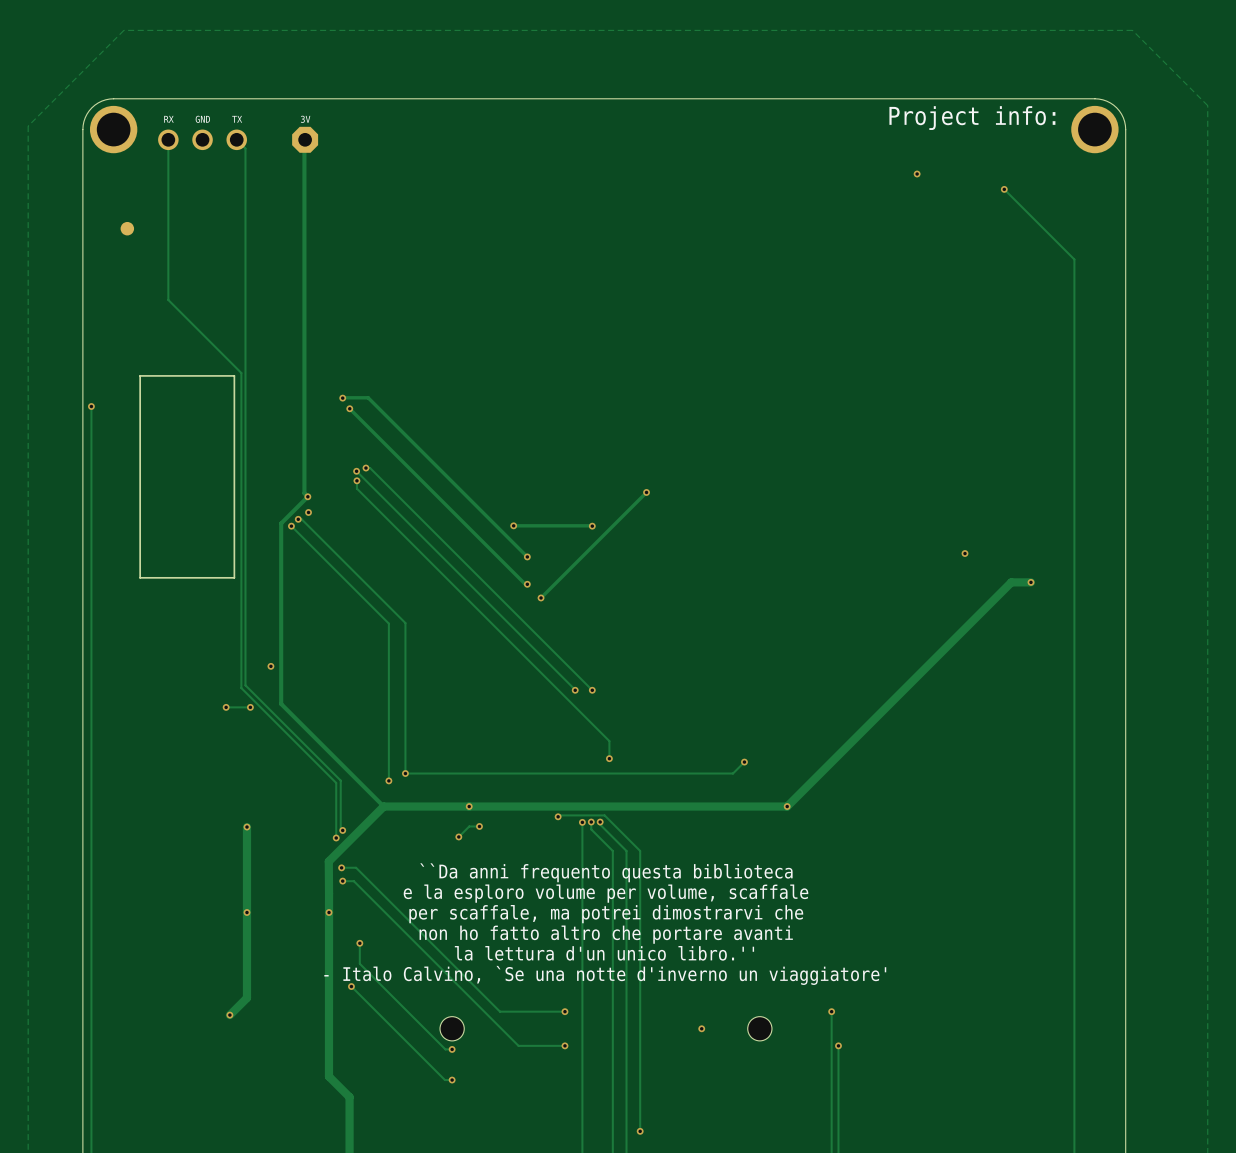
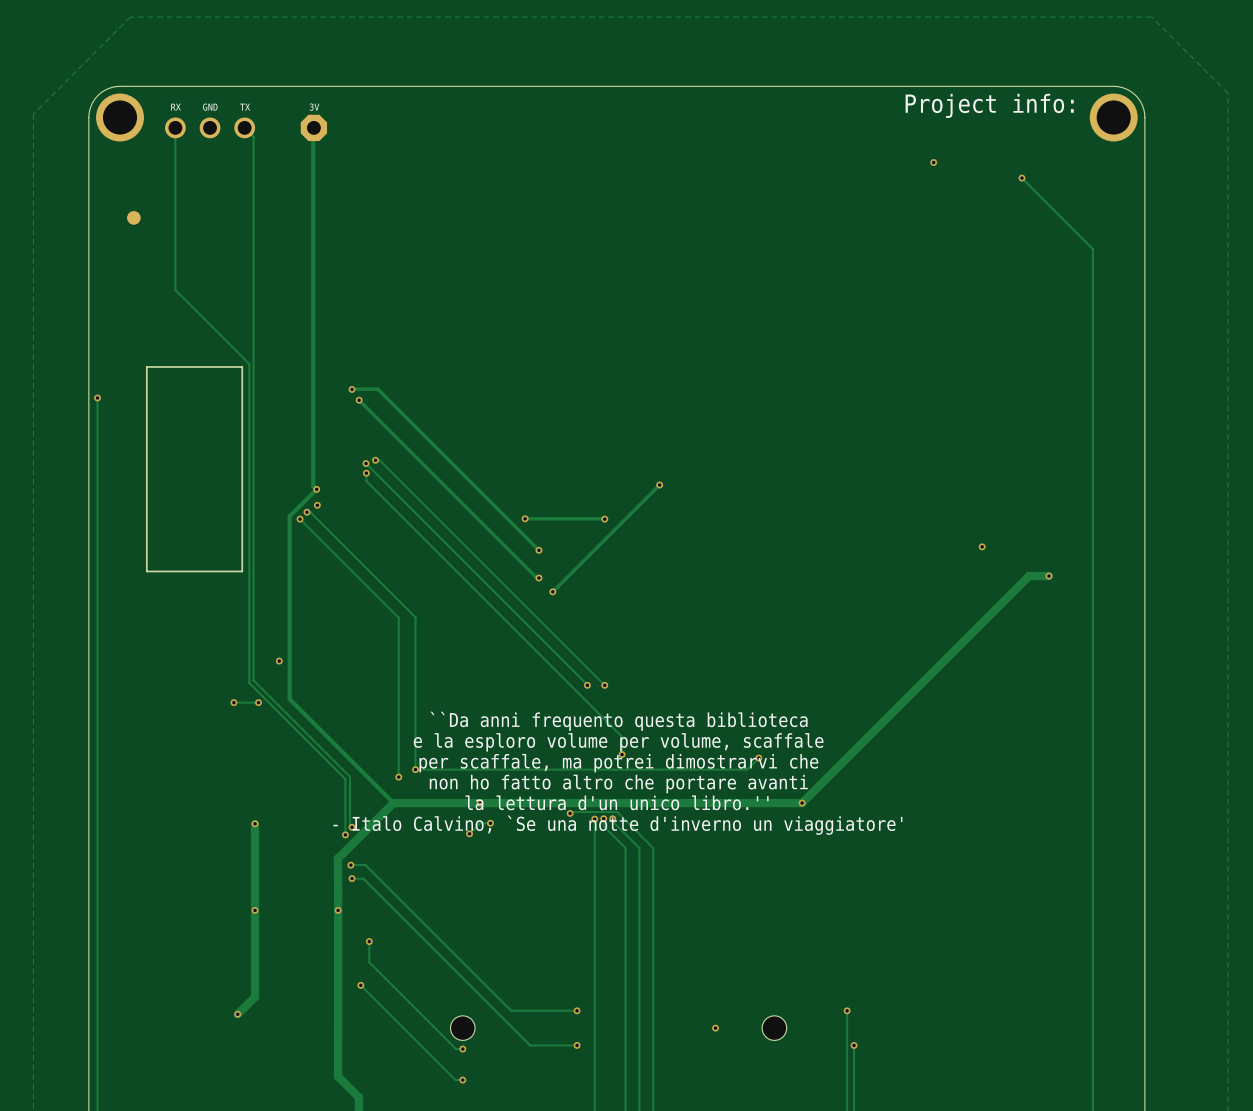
text position: ``Da anni frequento questa biblioteca (606, 872) -> ``Da anni frequento questa biblioteca (619, 721)
text position: e la esploro volume per volume, scaffale (606, 893) -> e la esploro volume per volume, scaffale (618, 742)
text position: per scaffale, ma potrei dimostrarvi che (606, 914) -> per scaffale, ma potrei dimostrarvi che (618, 763)
text position: non ho fatto altro che portare avanti (606, 934) -> non ho fatto altro che portare avanti (618, 783)
text position: la lettura d'un unico libro.'' (604, 953) -> la lettura d'un unico libro.'' (617, 802)
text position: - Italo Calvino, `Se una notte d'inverno un viaggiatore' (605, 975) -> - Italo Calvino, `Se una notte d'inverno un viaggiatore' (617, 825)

